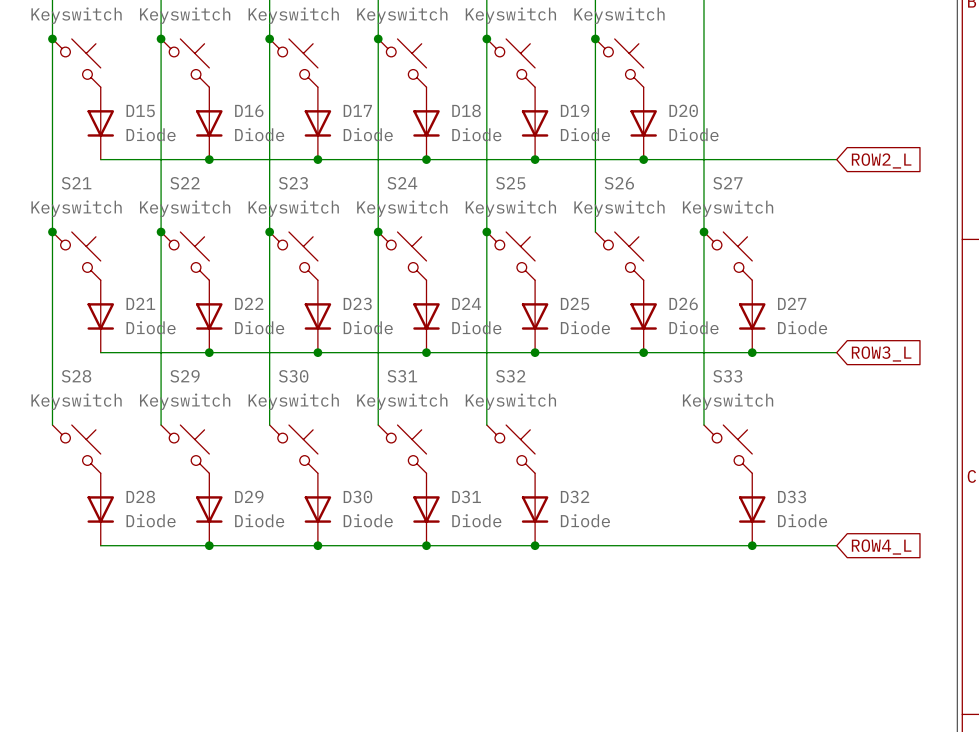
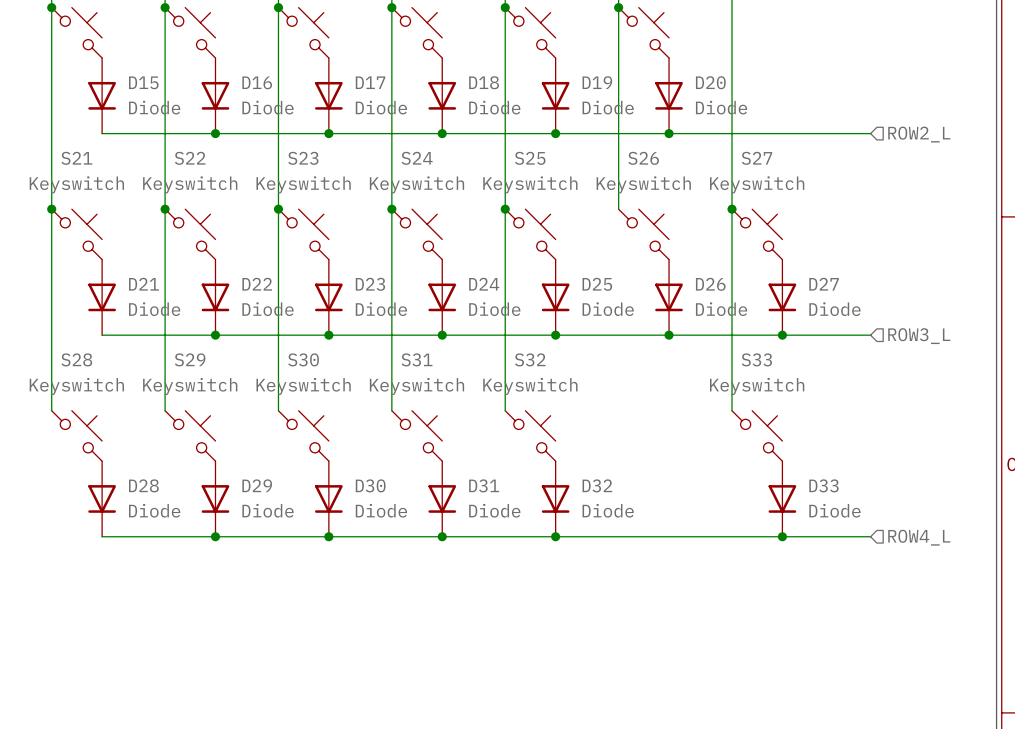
global label: ROW2_L (881, 160) -> none
hierarchical label: none -> ROW2_L (919, 134)
hierarchical label: none -> ROW3_L (919, 336)
global label: ROW3_L (881, 354) -> none
hierarchical label: none -> ROW4_L (919, 537)
global label: ROW4_L (881, 547) -> none

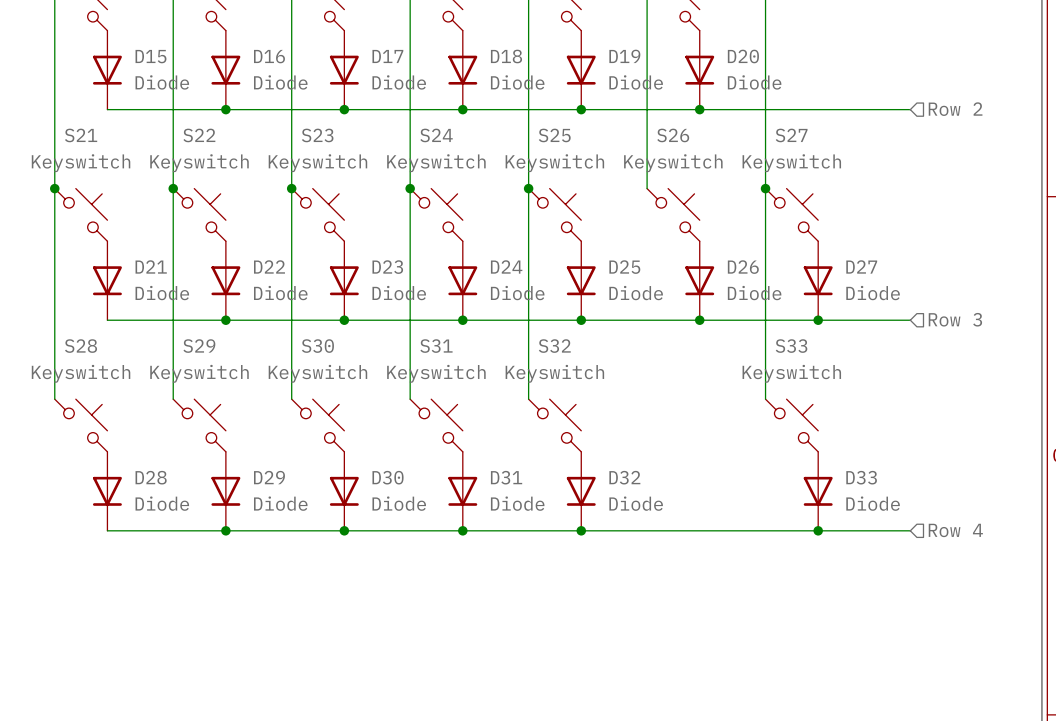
hierarchical label: ROW2_L (919, 134) -> Row 2 (955, 109)
hierarchical label: ROW3_L (919, 336) -> Row 3 (955, 319)
hierarchical label: ROW4_L (919, 537) -> Row 4 (955, 530)

